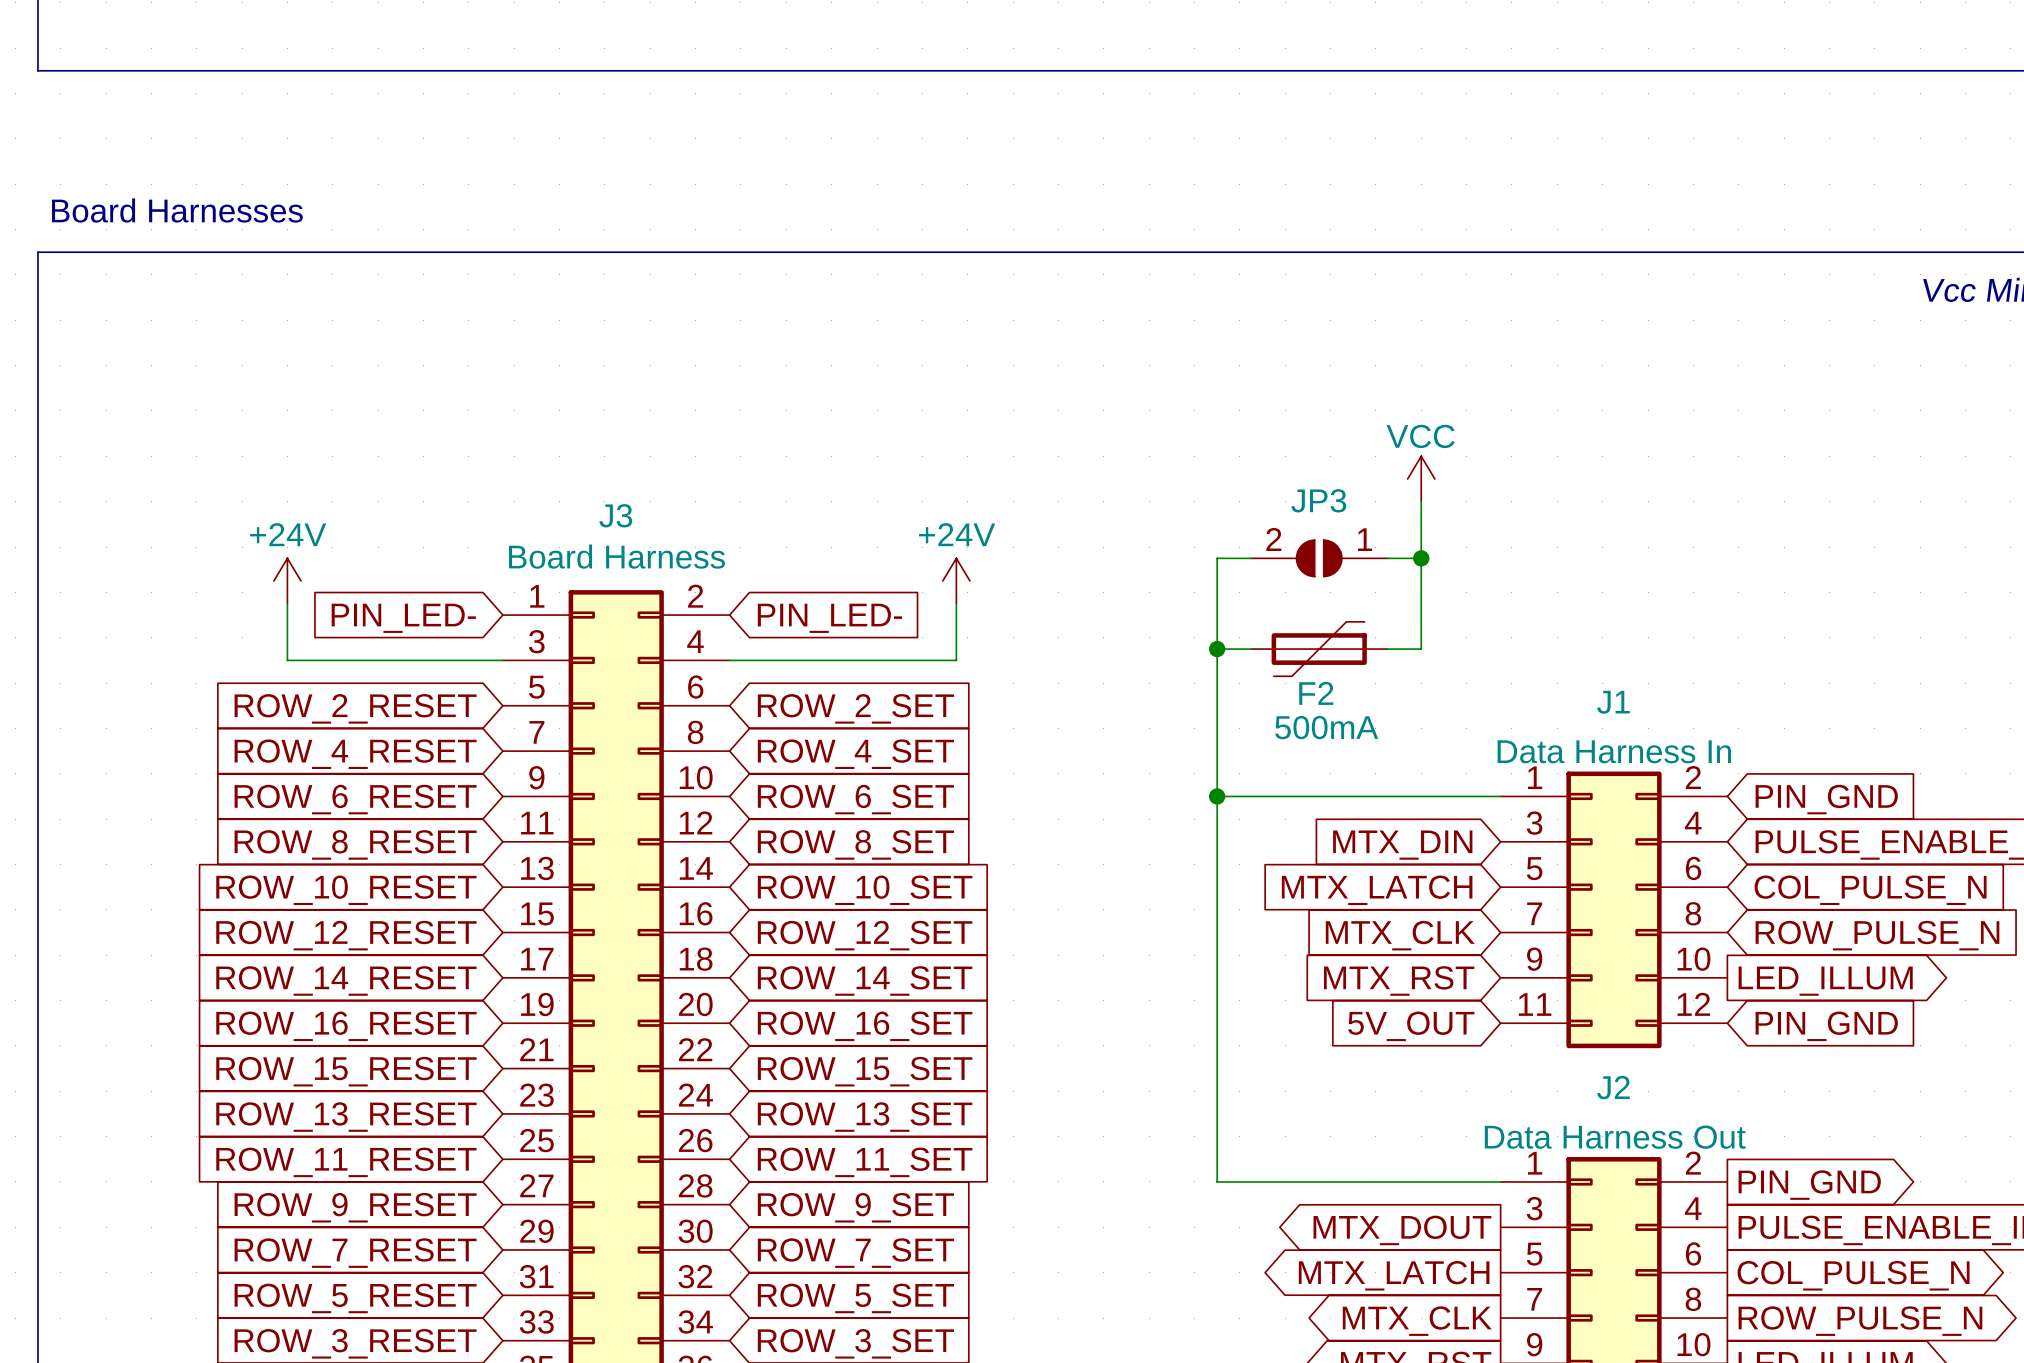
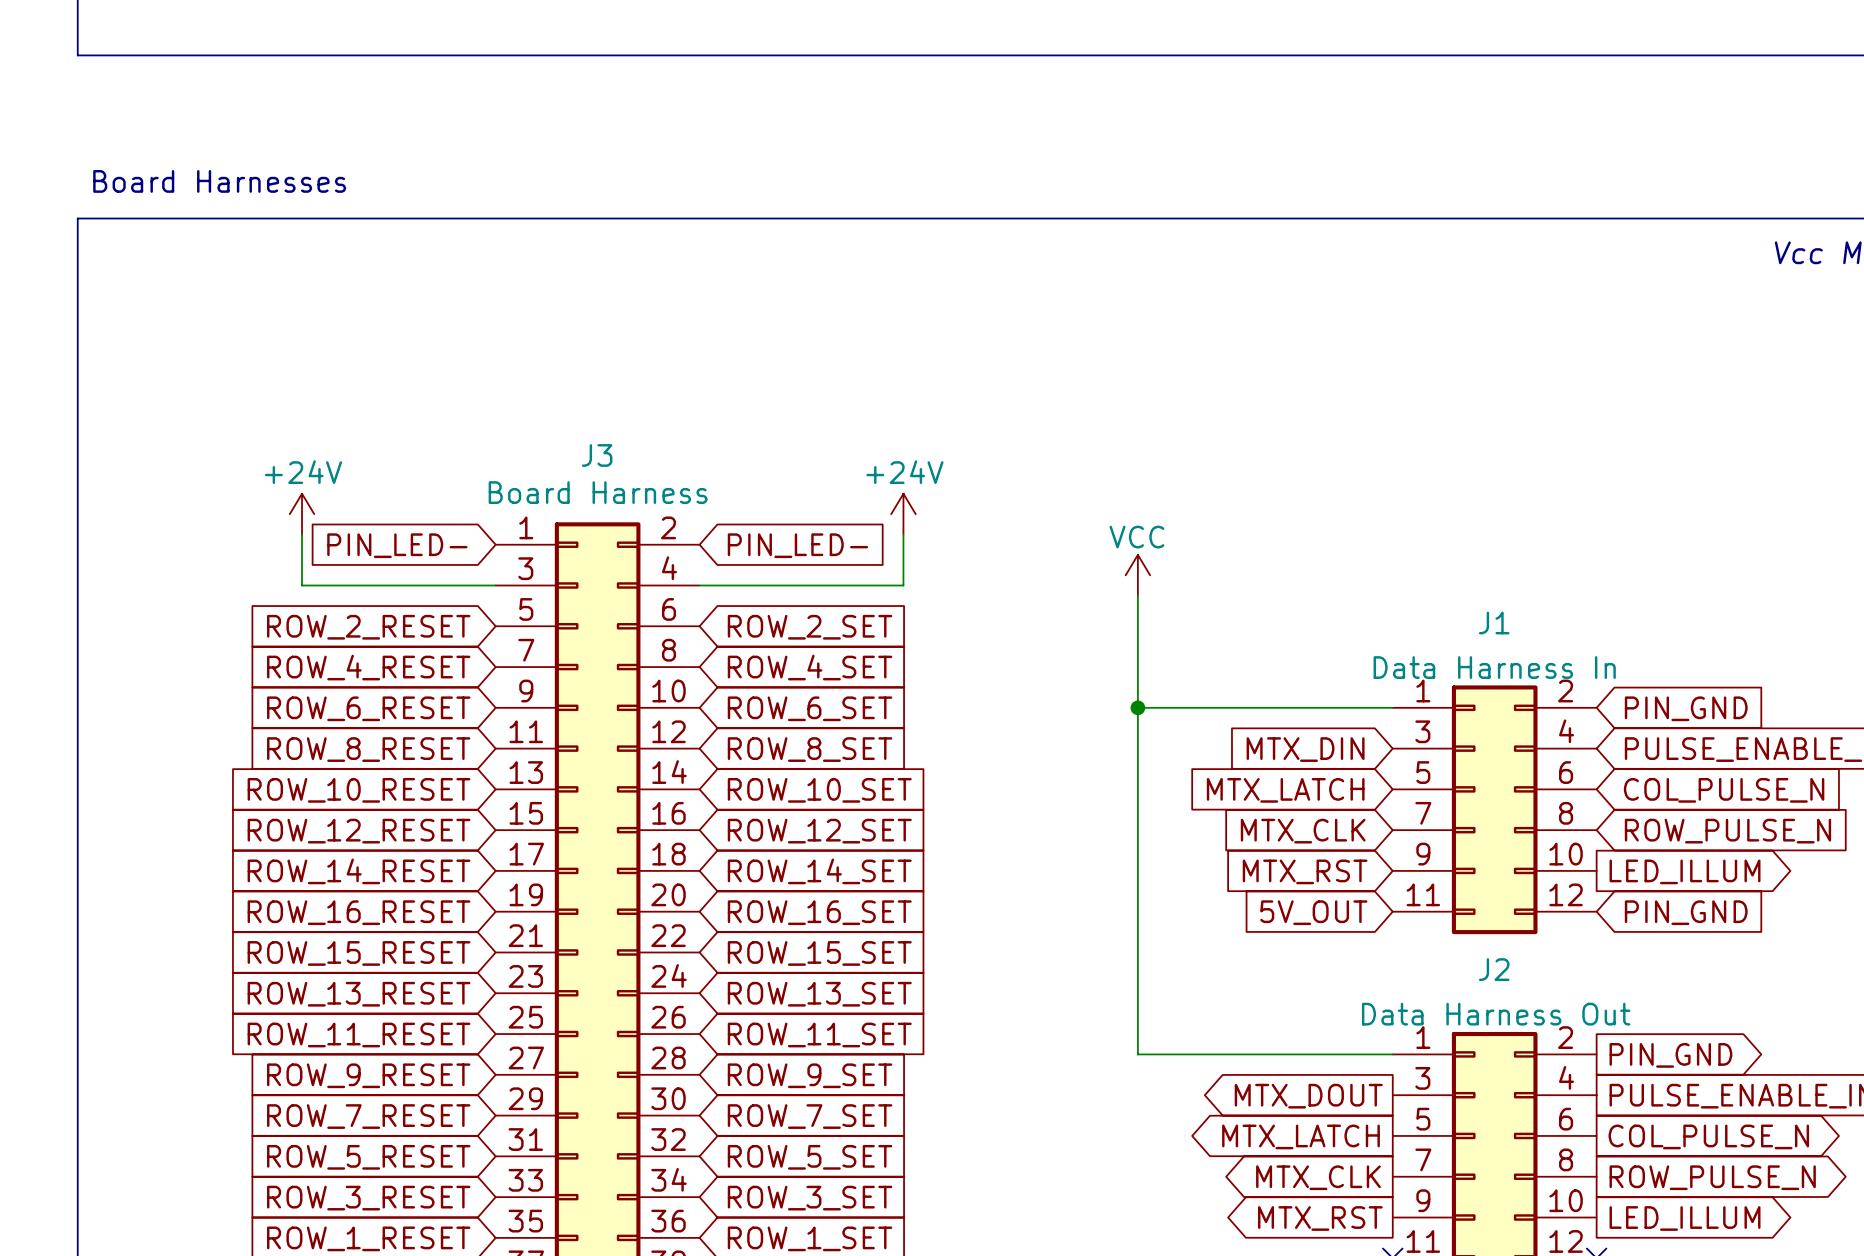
power symbol position: VCC (1421, 478) -> VCC (1137, 575)
wire: (1421, 501) (1421, 649) (1387, 649) -> none
wire: (1251, 558) (1217, 558) (1217, 671) -> none
JP3: (1319, 558) -> none
wire: (1387, 558) (1421, 558) -> none
junction: (1421, 558) -> none
wire: (1217, 649) (1251, 649) -> none
junction: (1217, 649) -> none
F2: 500mA (1319, 649) -> none

